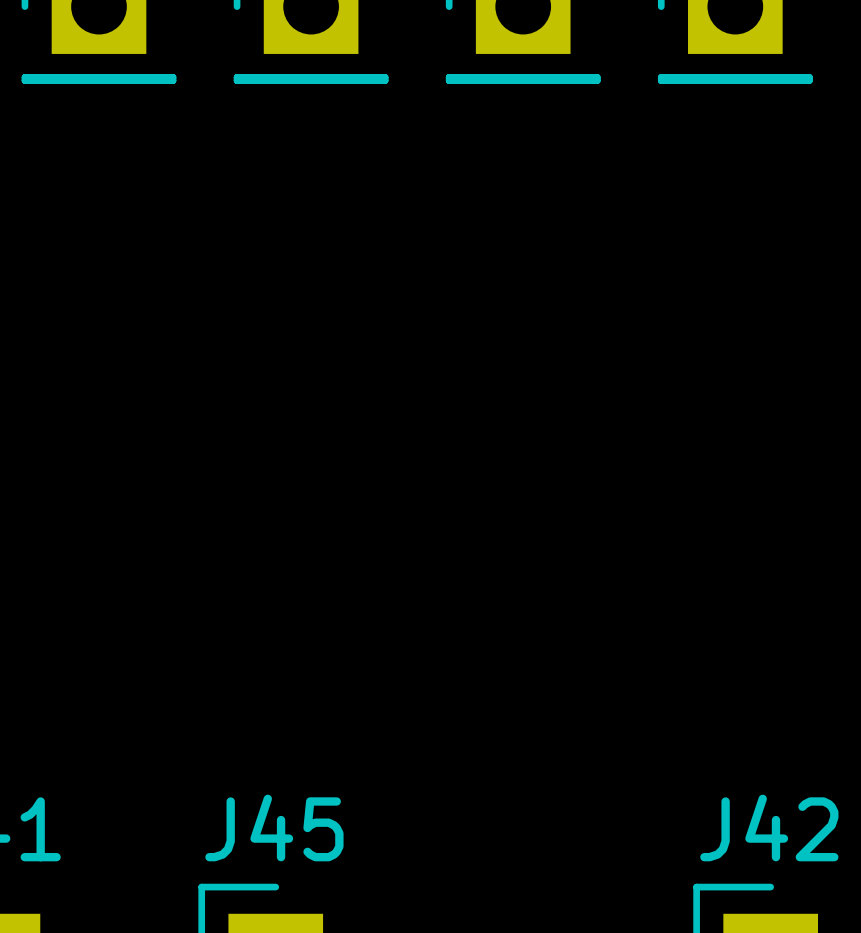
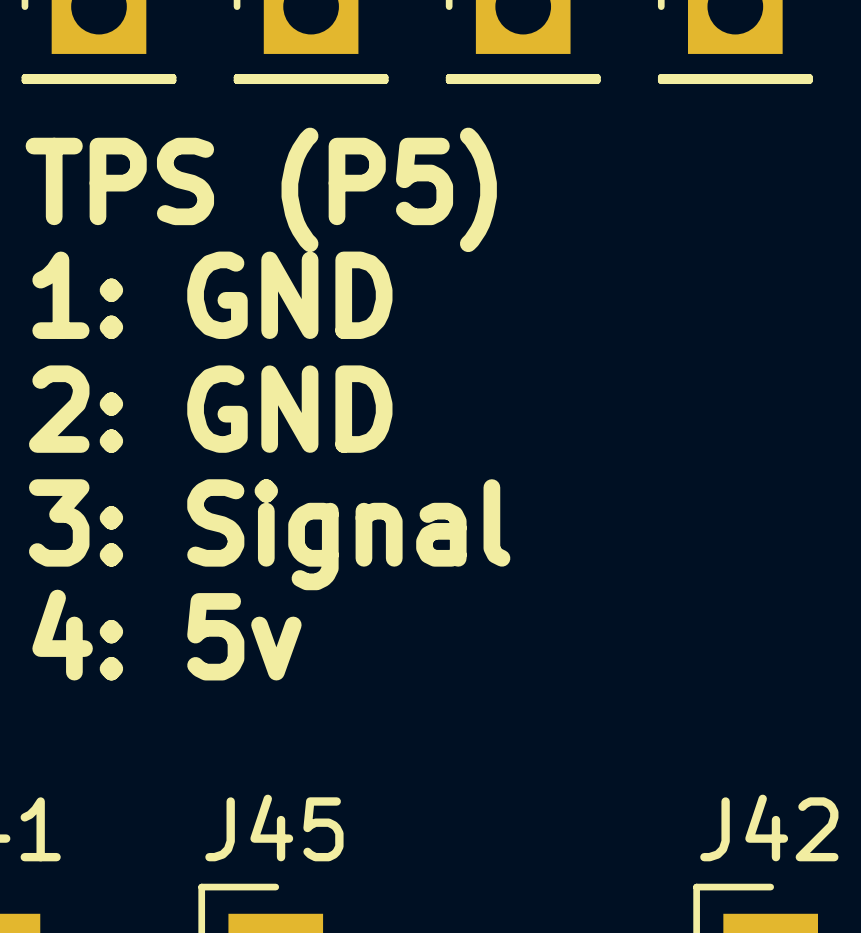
text: none -> TPS (P5) (261, 189)
text: none -> 1: GND (212, 295)
text: none -> 2: GND (210, 409)
text: none -> 3: Signal (269, 534)
text: none -> 4: 5v (166, 635)

